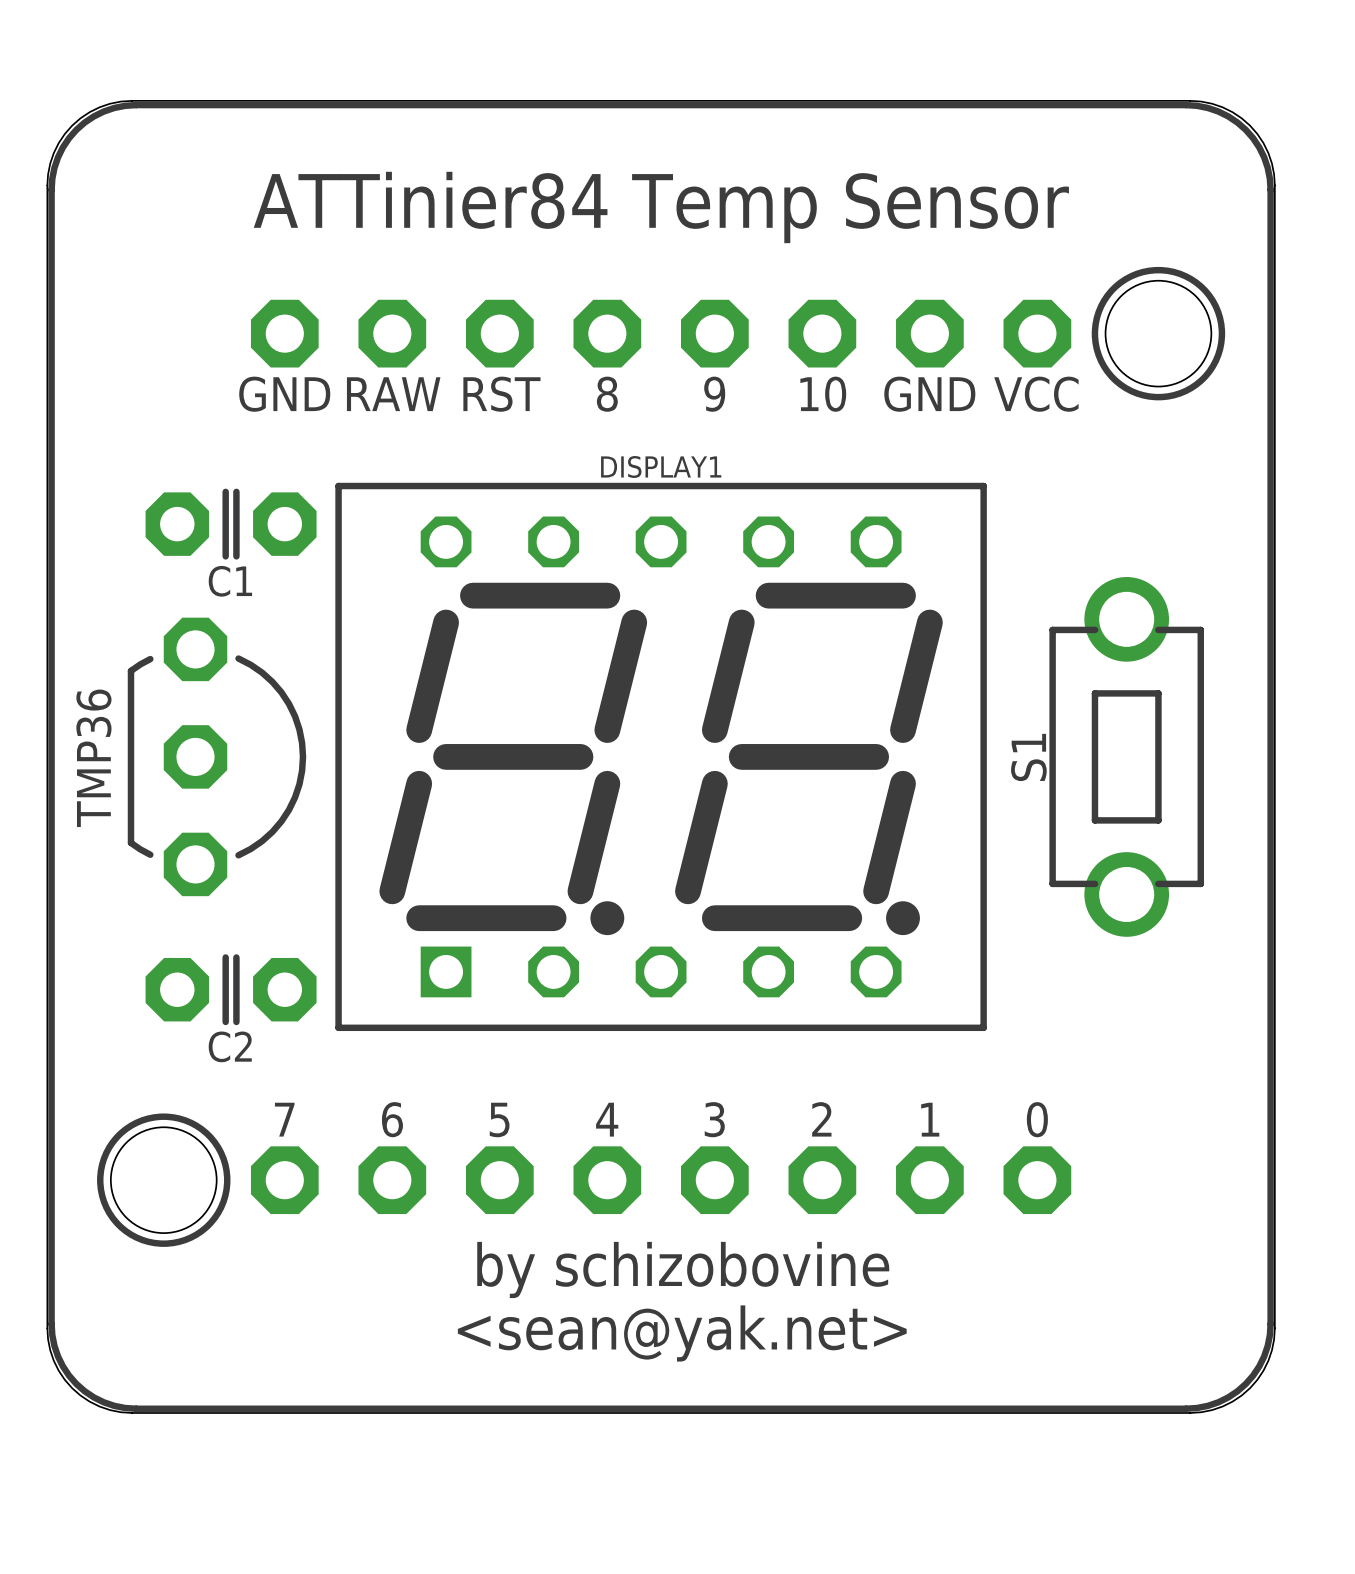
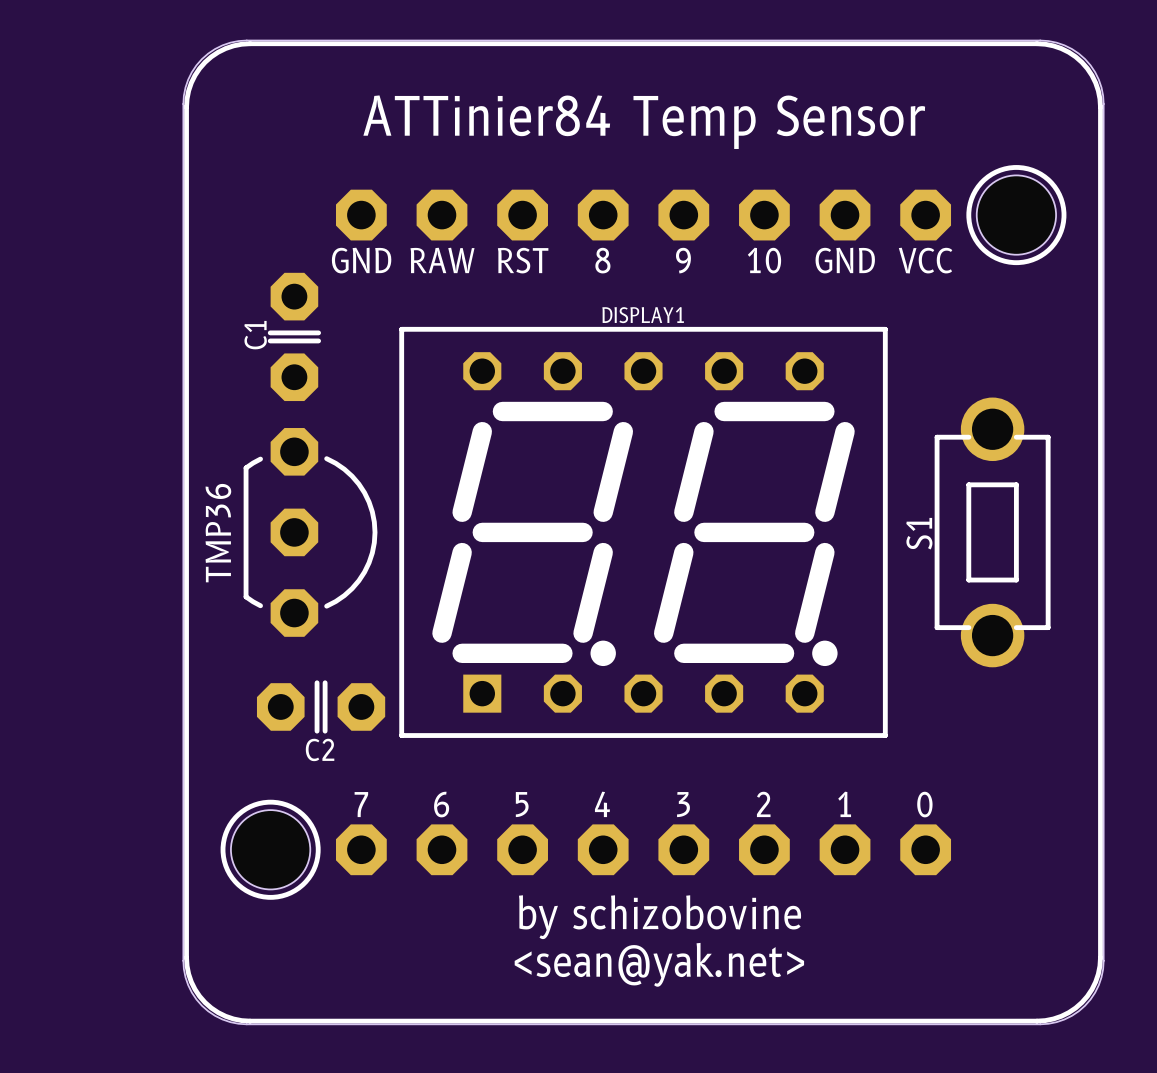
C1 rotation: 0° (231, 524) -> 90° clockwise (294, 336)

